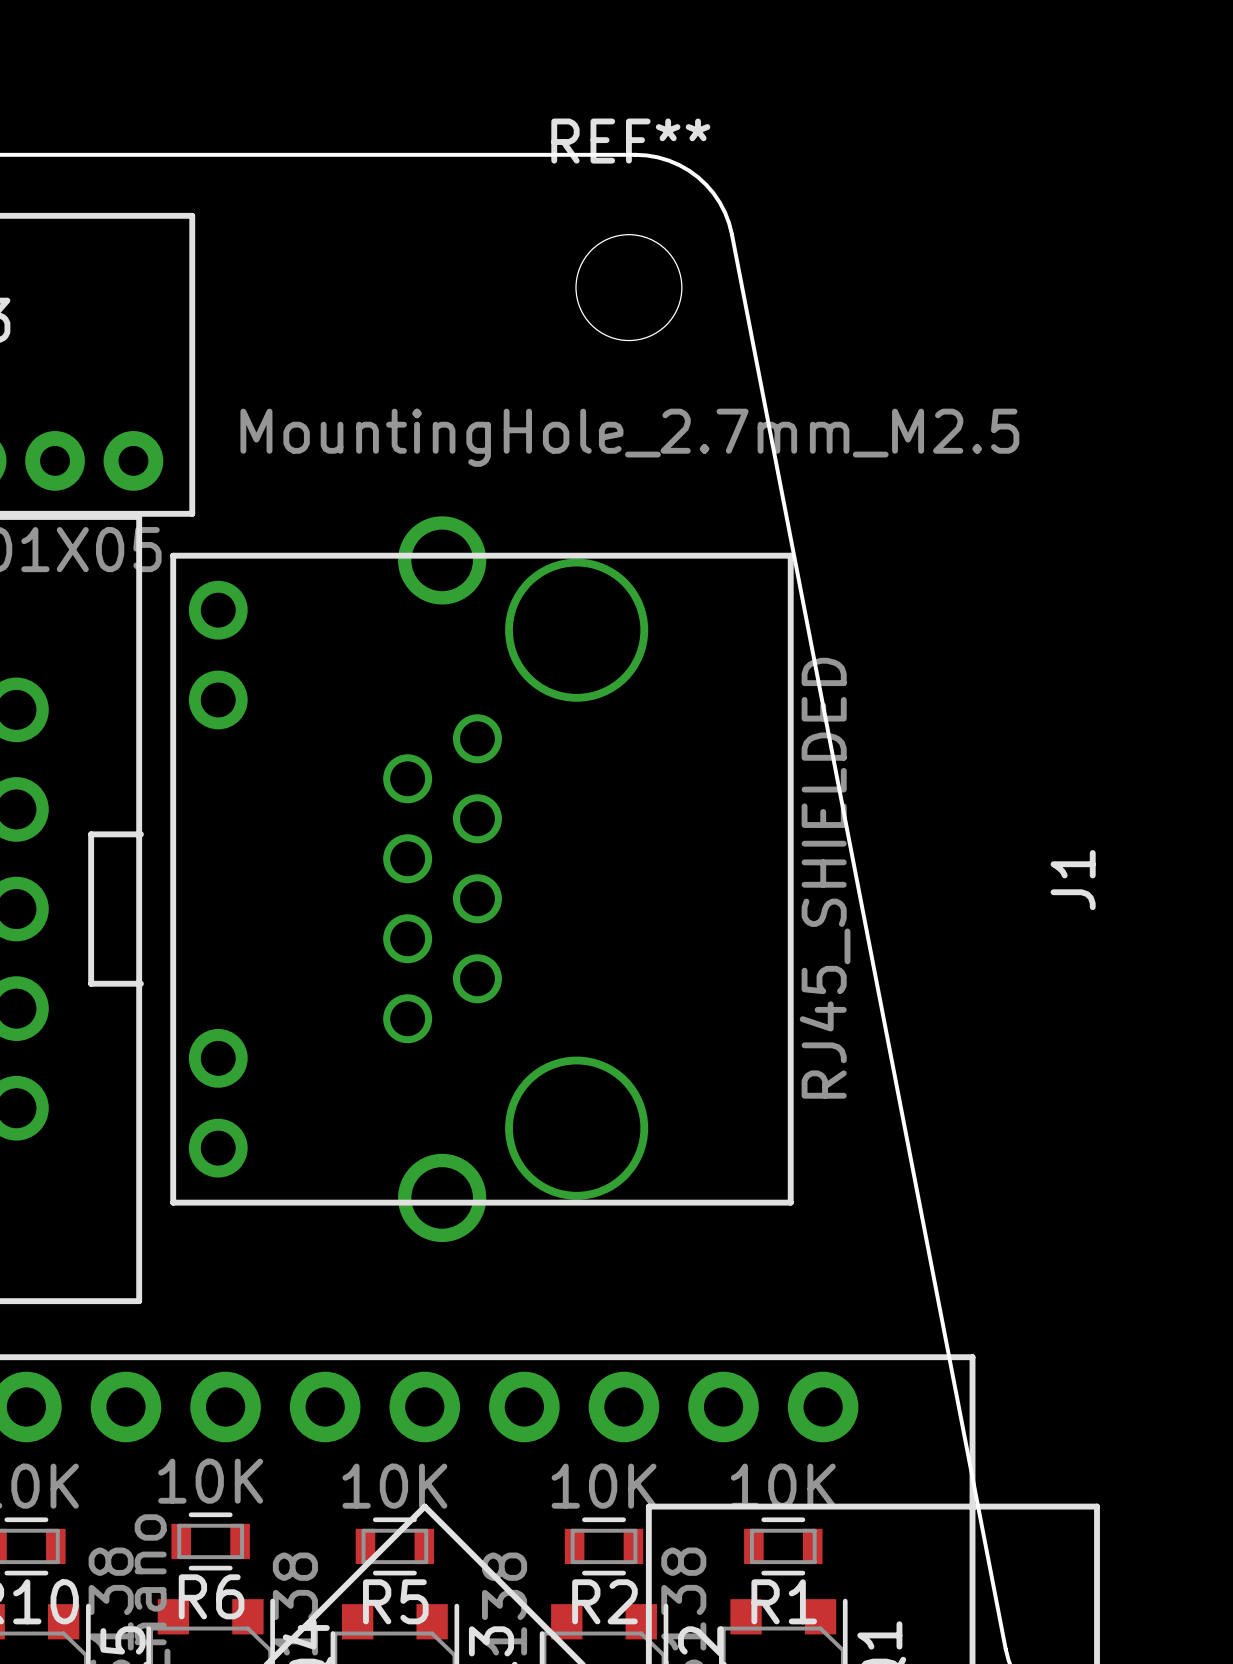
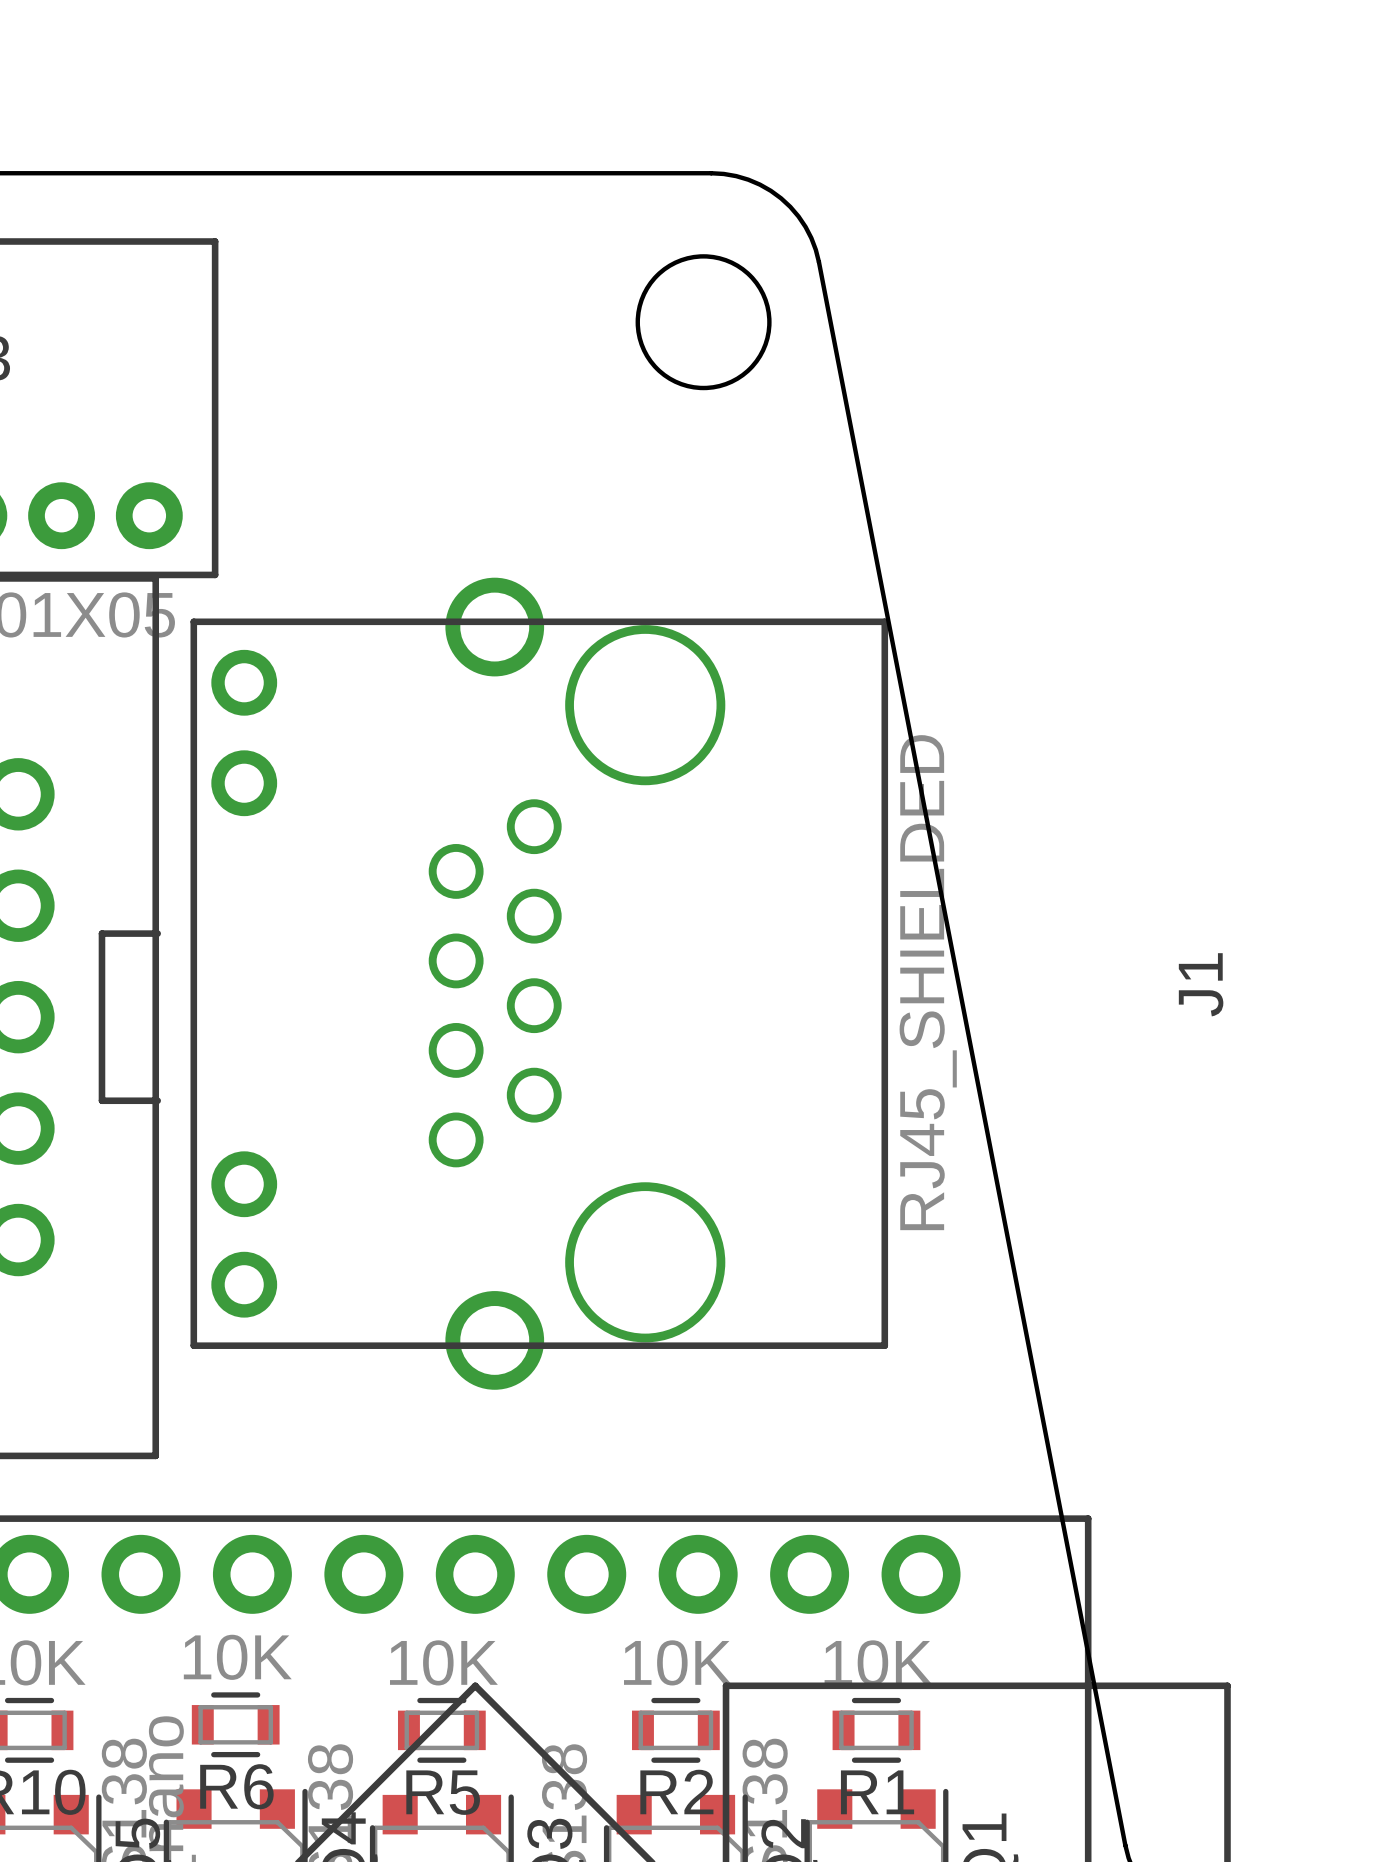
round board edge: none -> [635, 254, 772, 391]
REF**: MountingHole_2.7mm_M2.5 (628, 287) -> none

